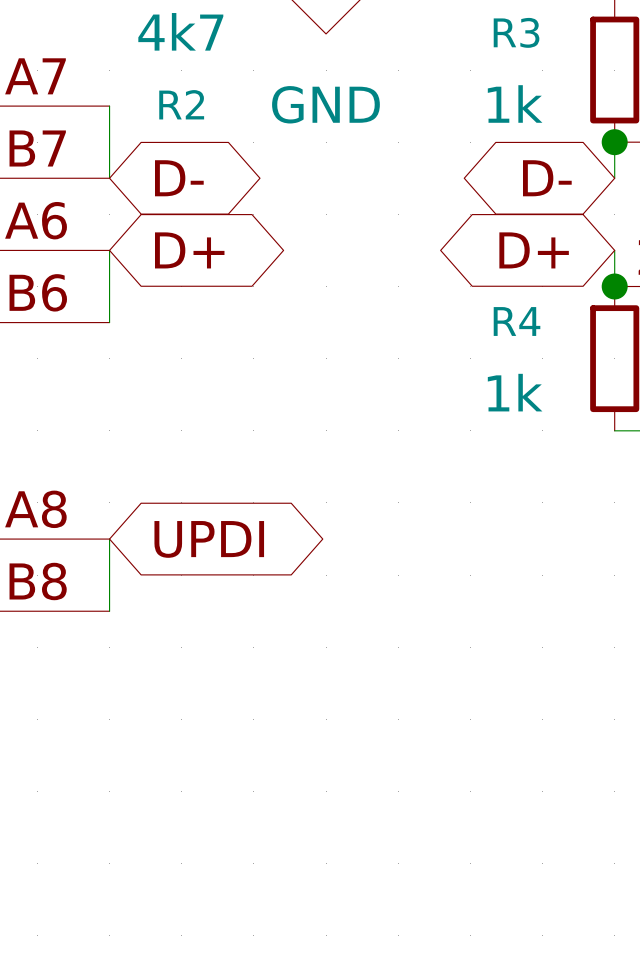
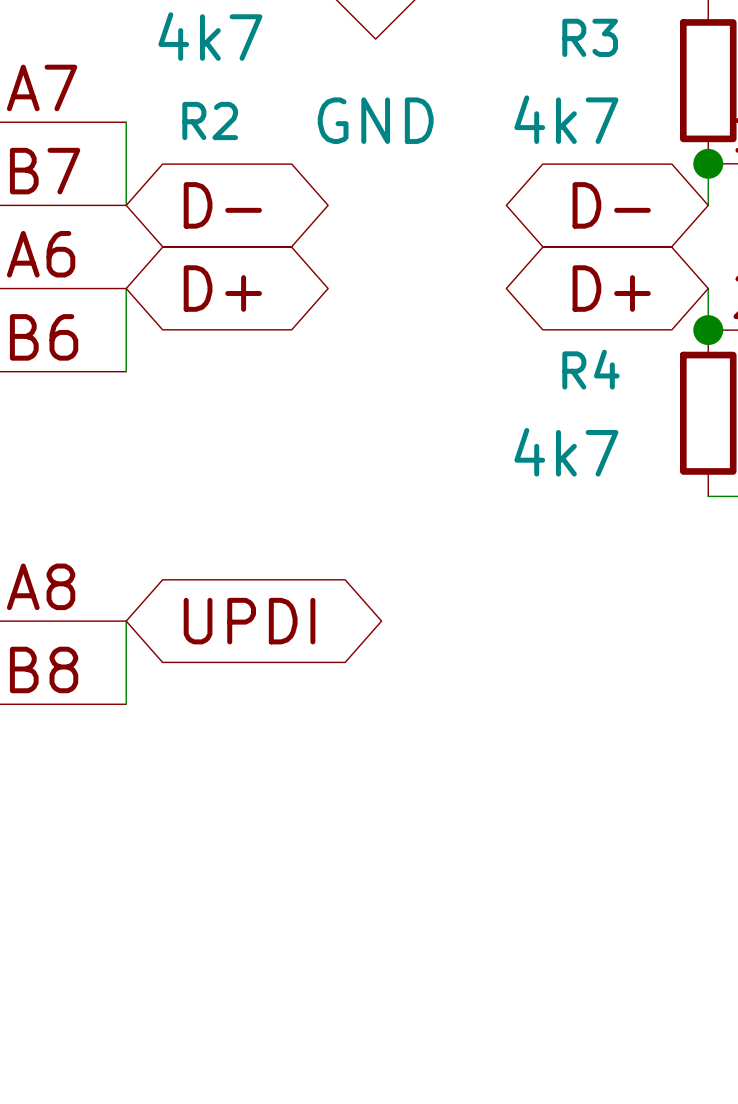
R3 value: 1k (515, 103) -> 4k7 (566, 119)
R4 value: 1k (515, 392) -> 4k7 (566, 452)

